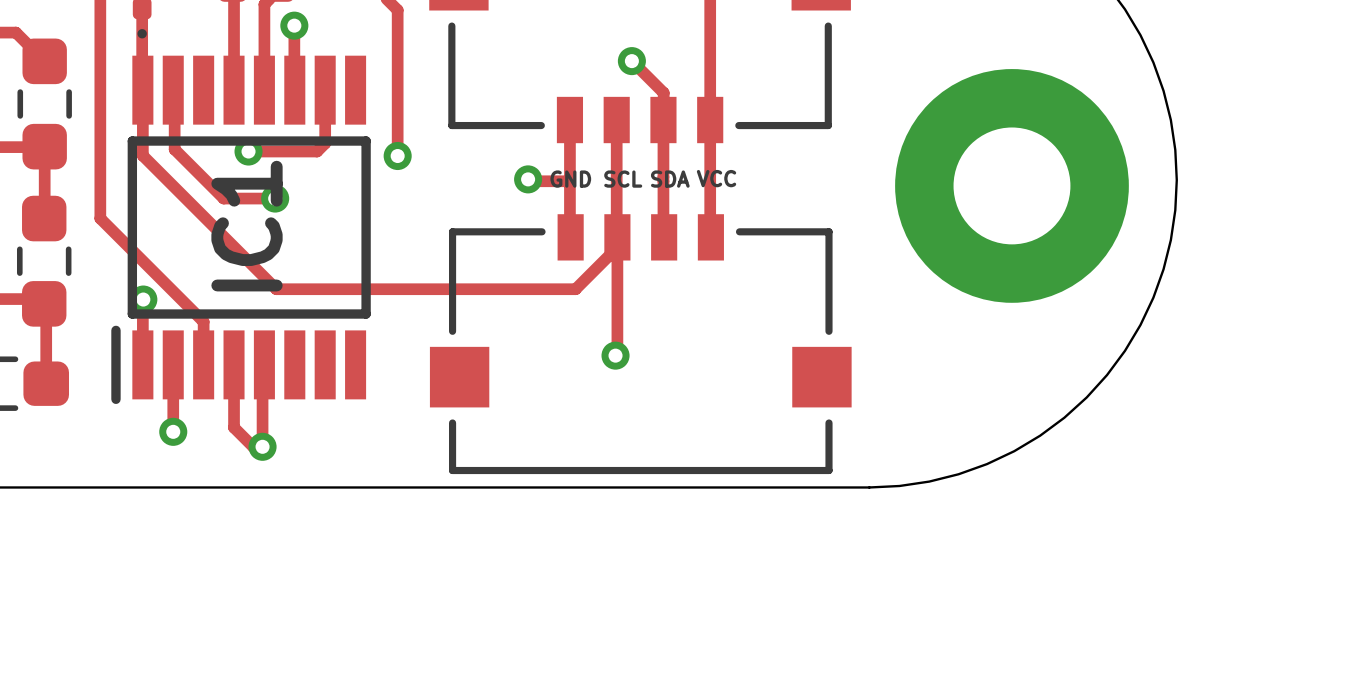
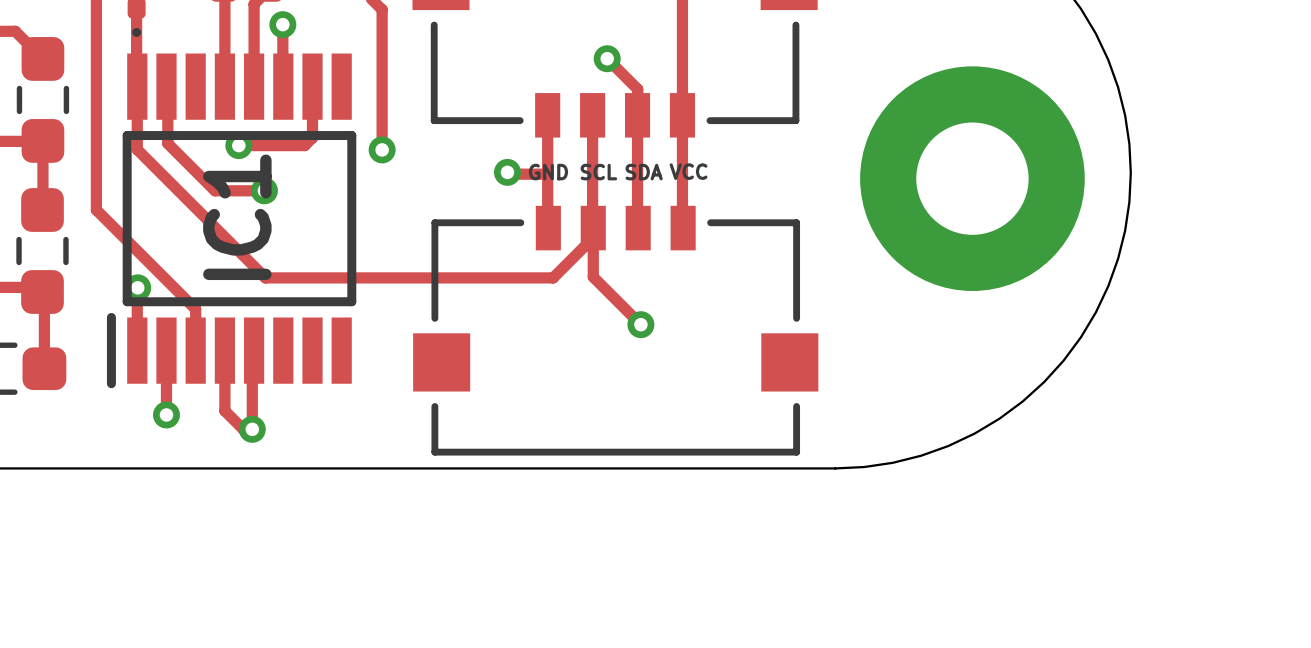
track: (617, 288) (617, 353) (615, 355) -> (593, 277) (640, 324)
via position: (615, 355) -> (640, 324)

